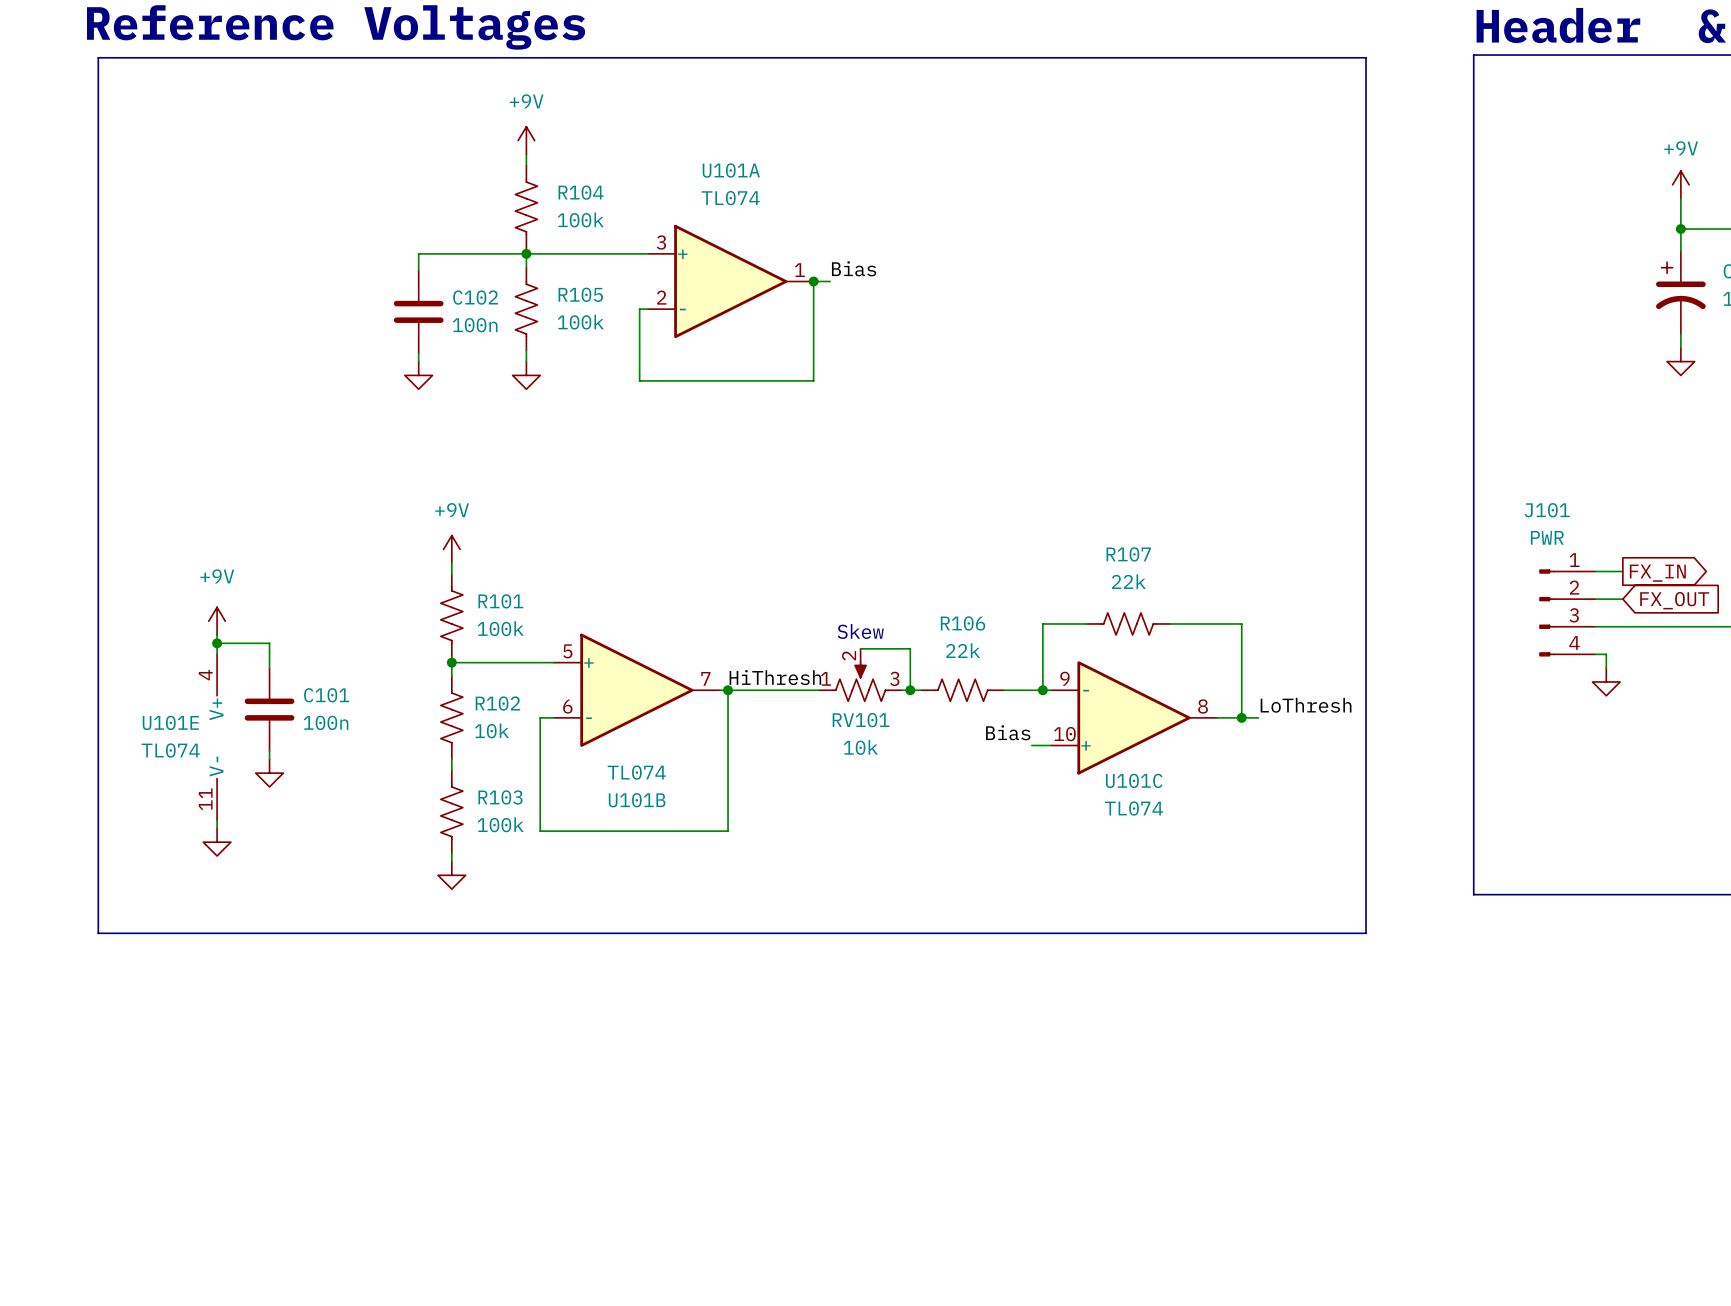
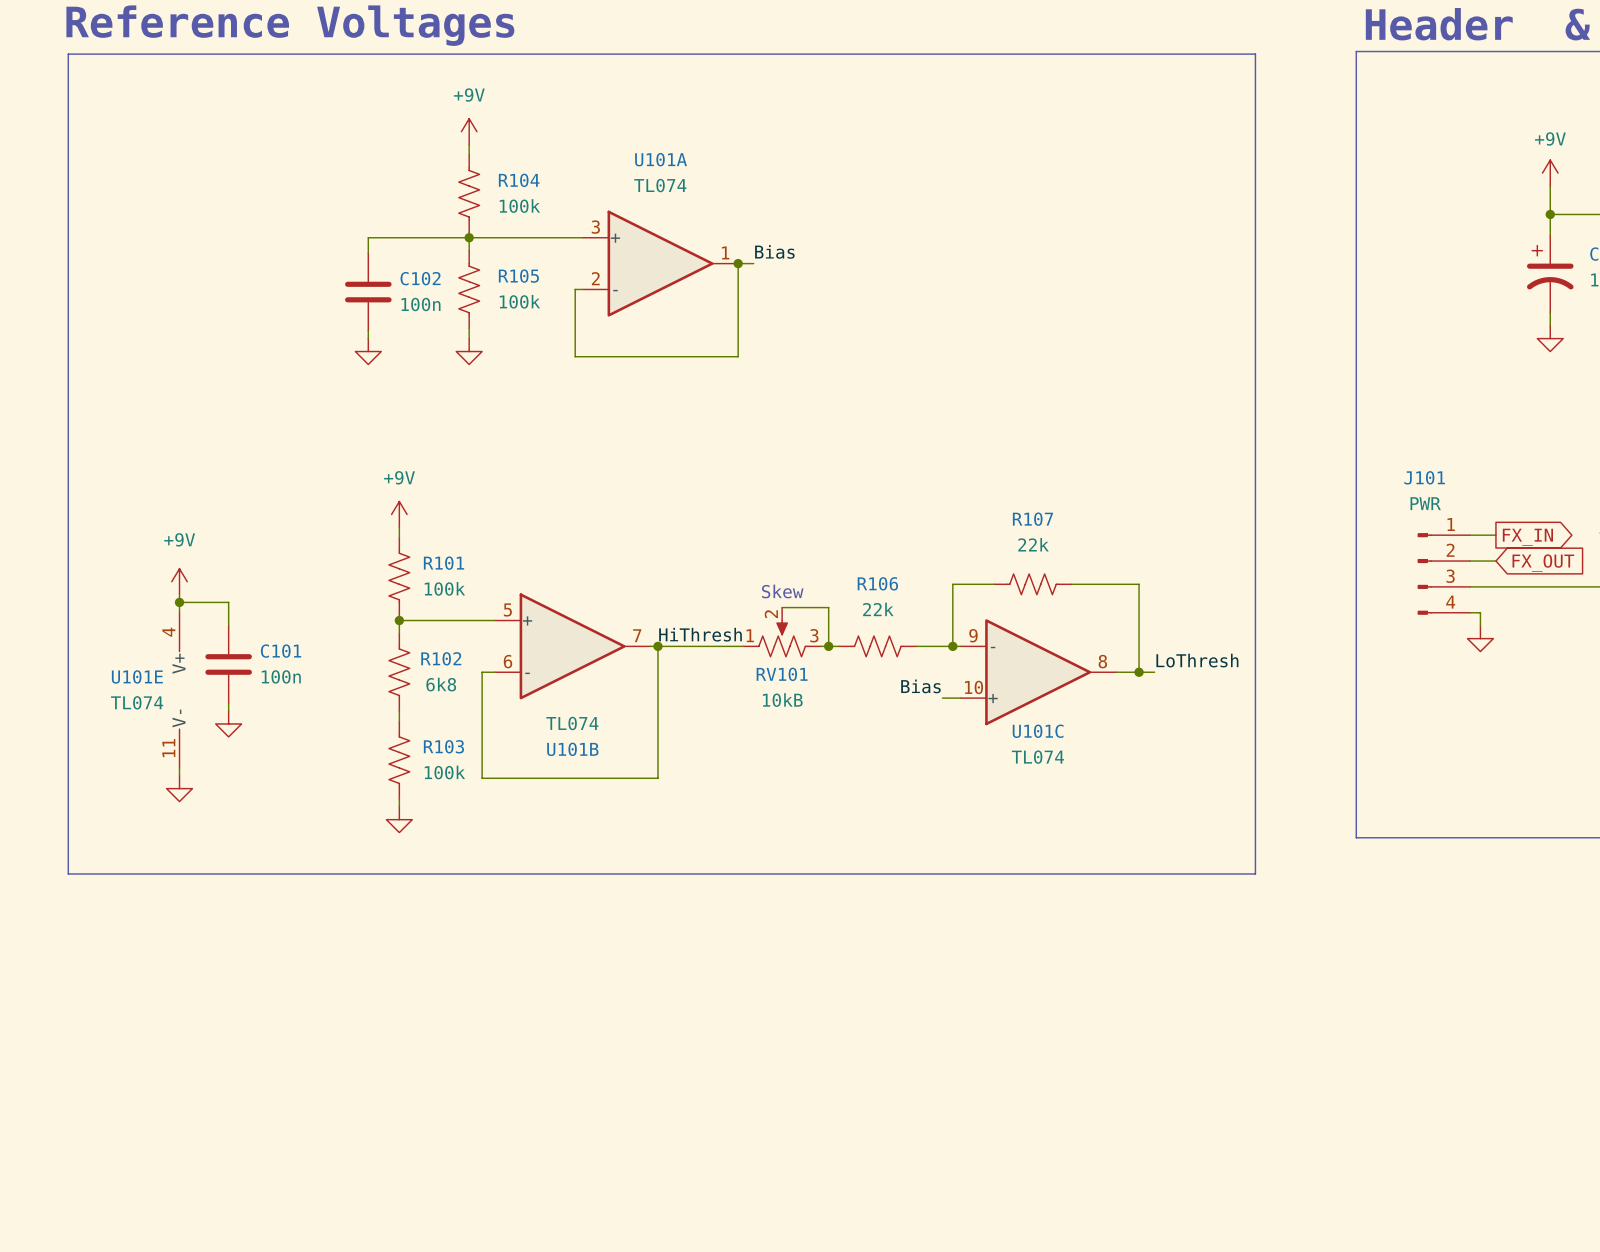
R102 value: 10k (492, 730) -> 6k8 (441, 684)
RV101 value: 10k (860, 747) -> 10kB (782, 700)

